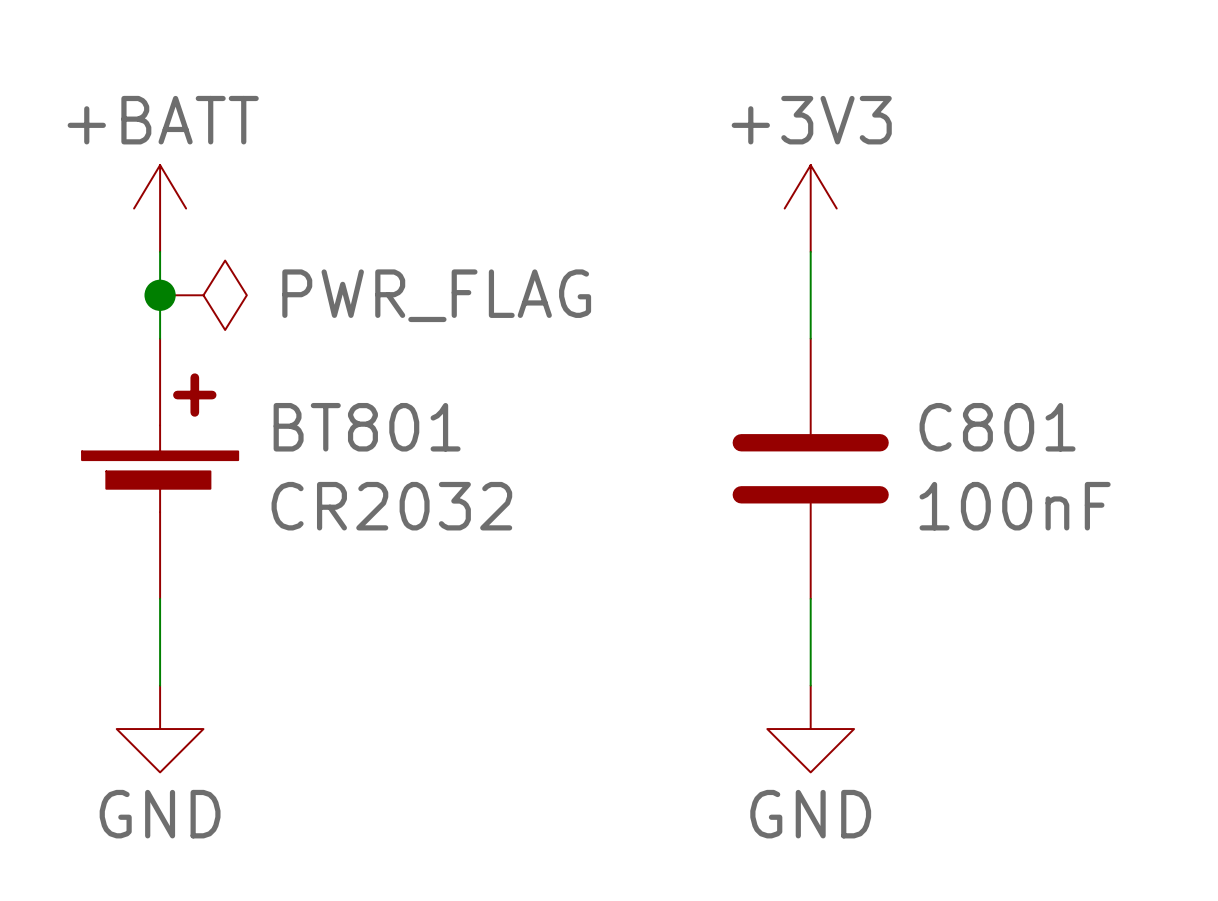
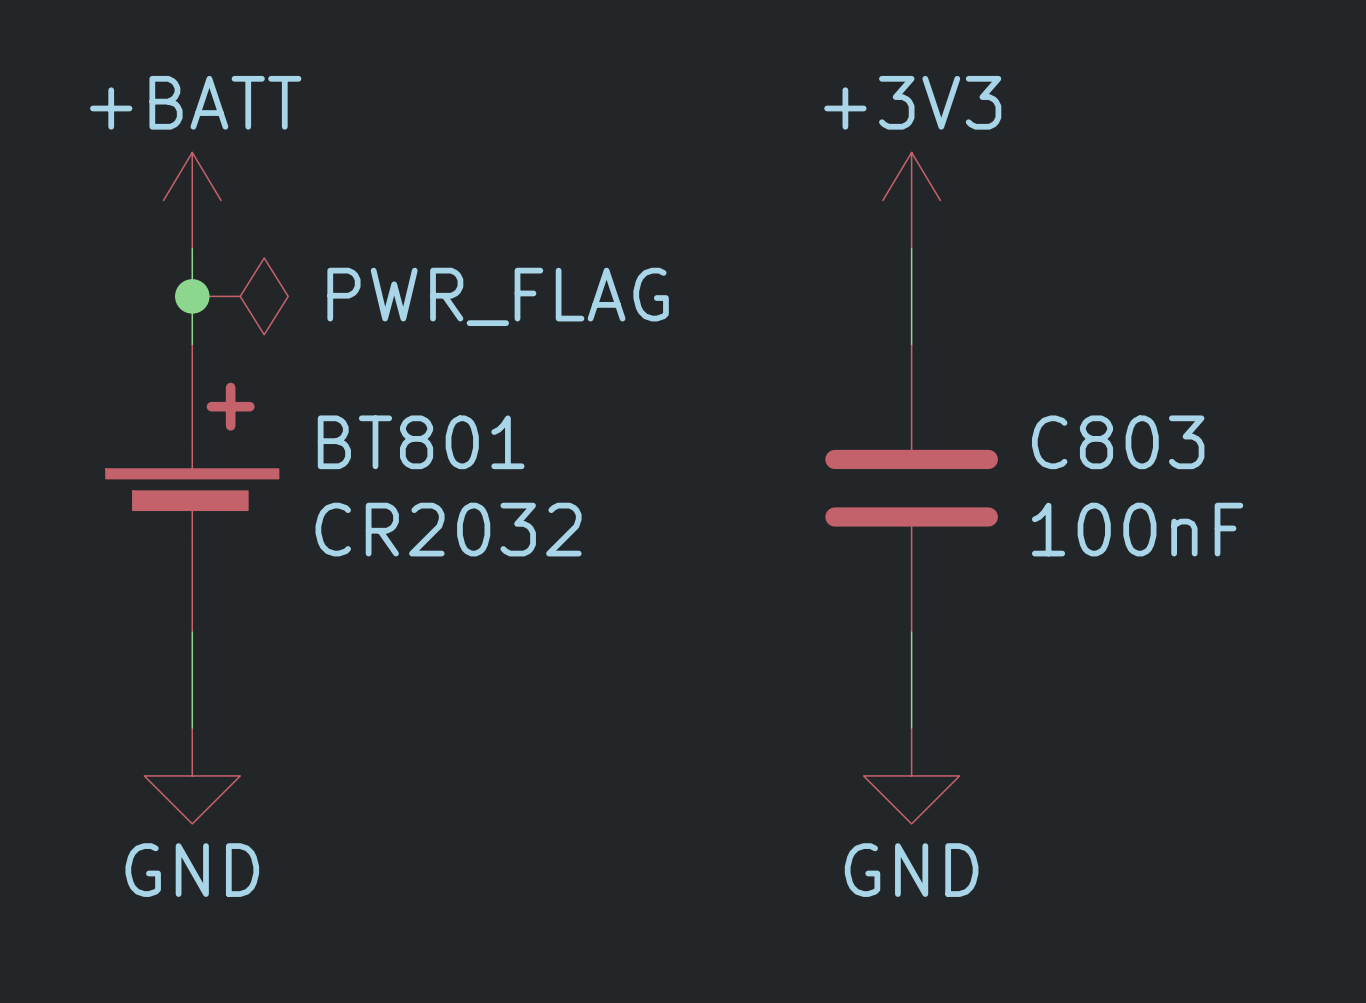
C801 name: C801 (997, 427) -> C803 (1118, 442)

